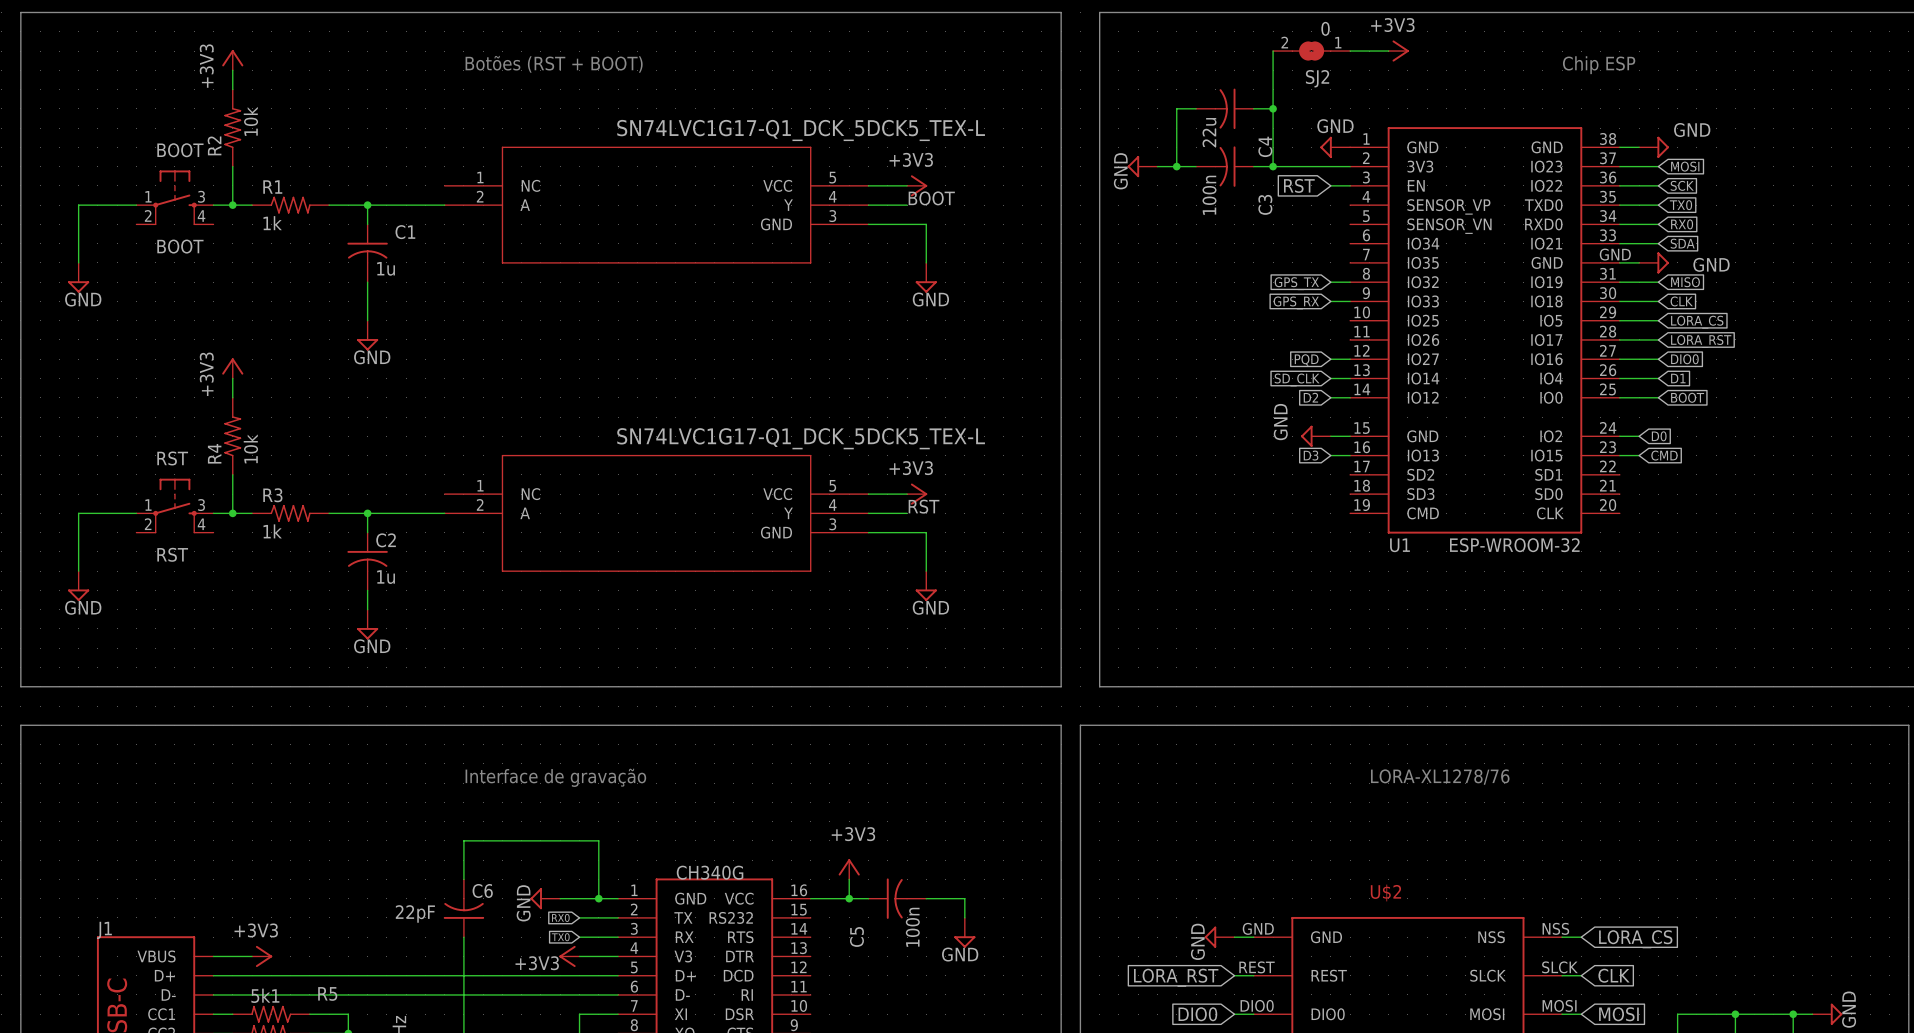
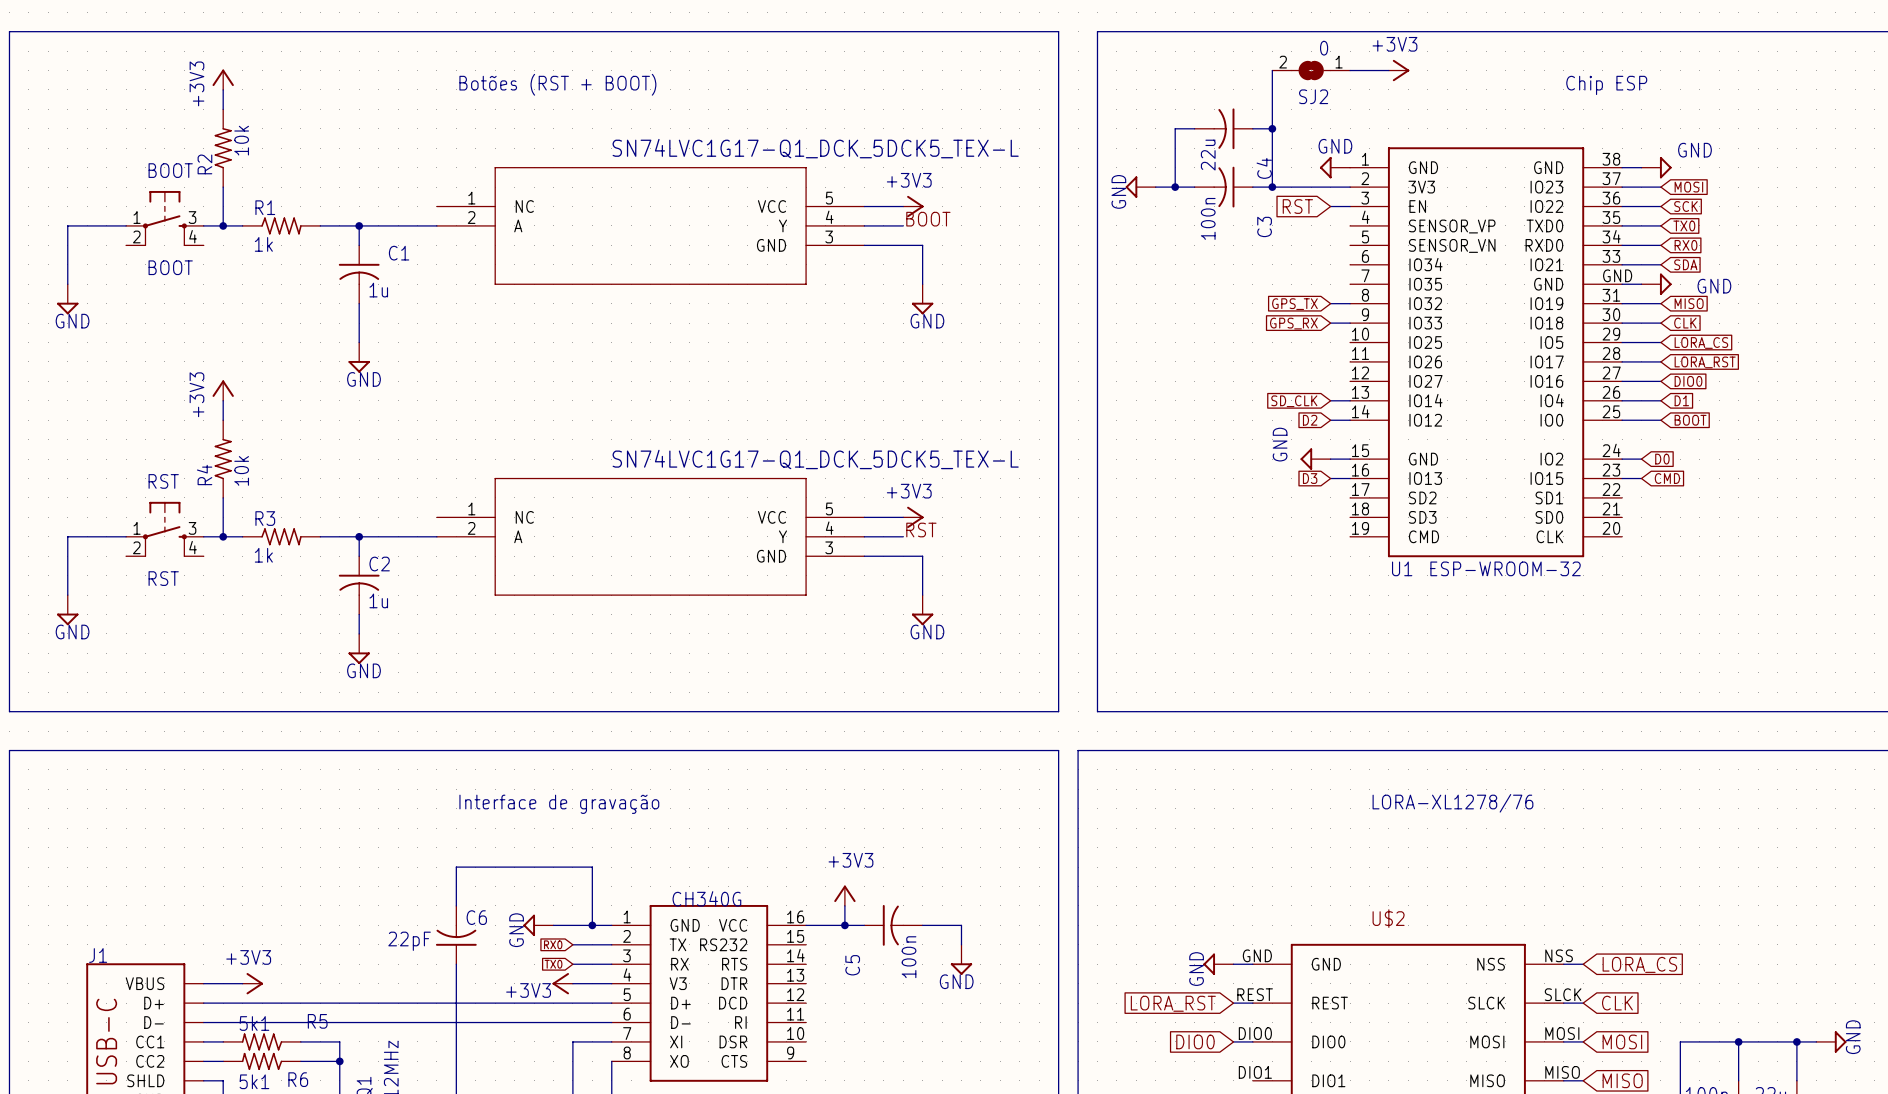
wire: (1330, 359) (1350, 359) -> none
global label: PQD (1306, 360) -> none

